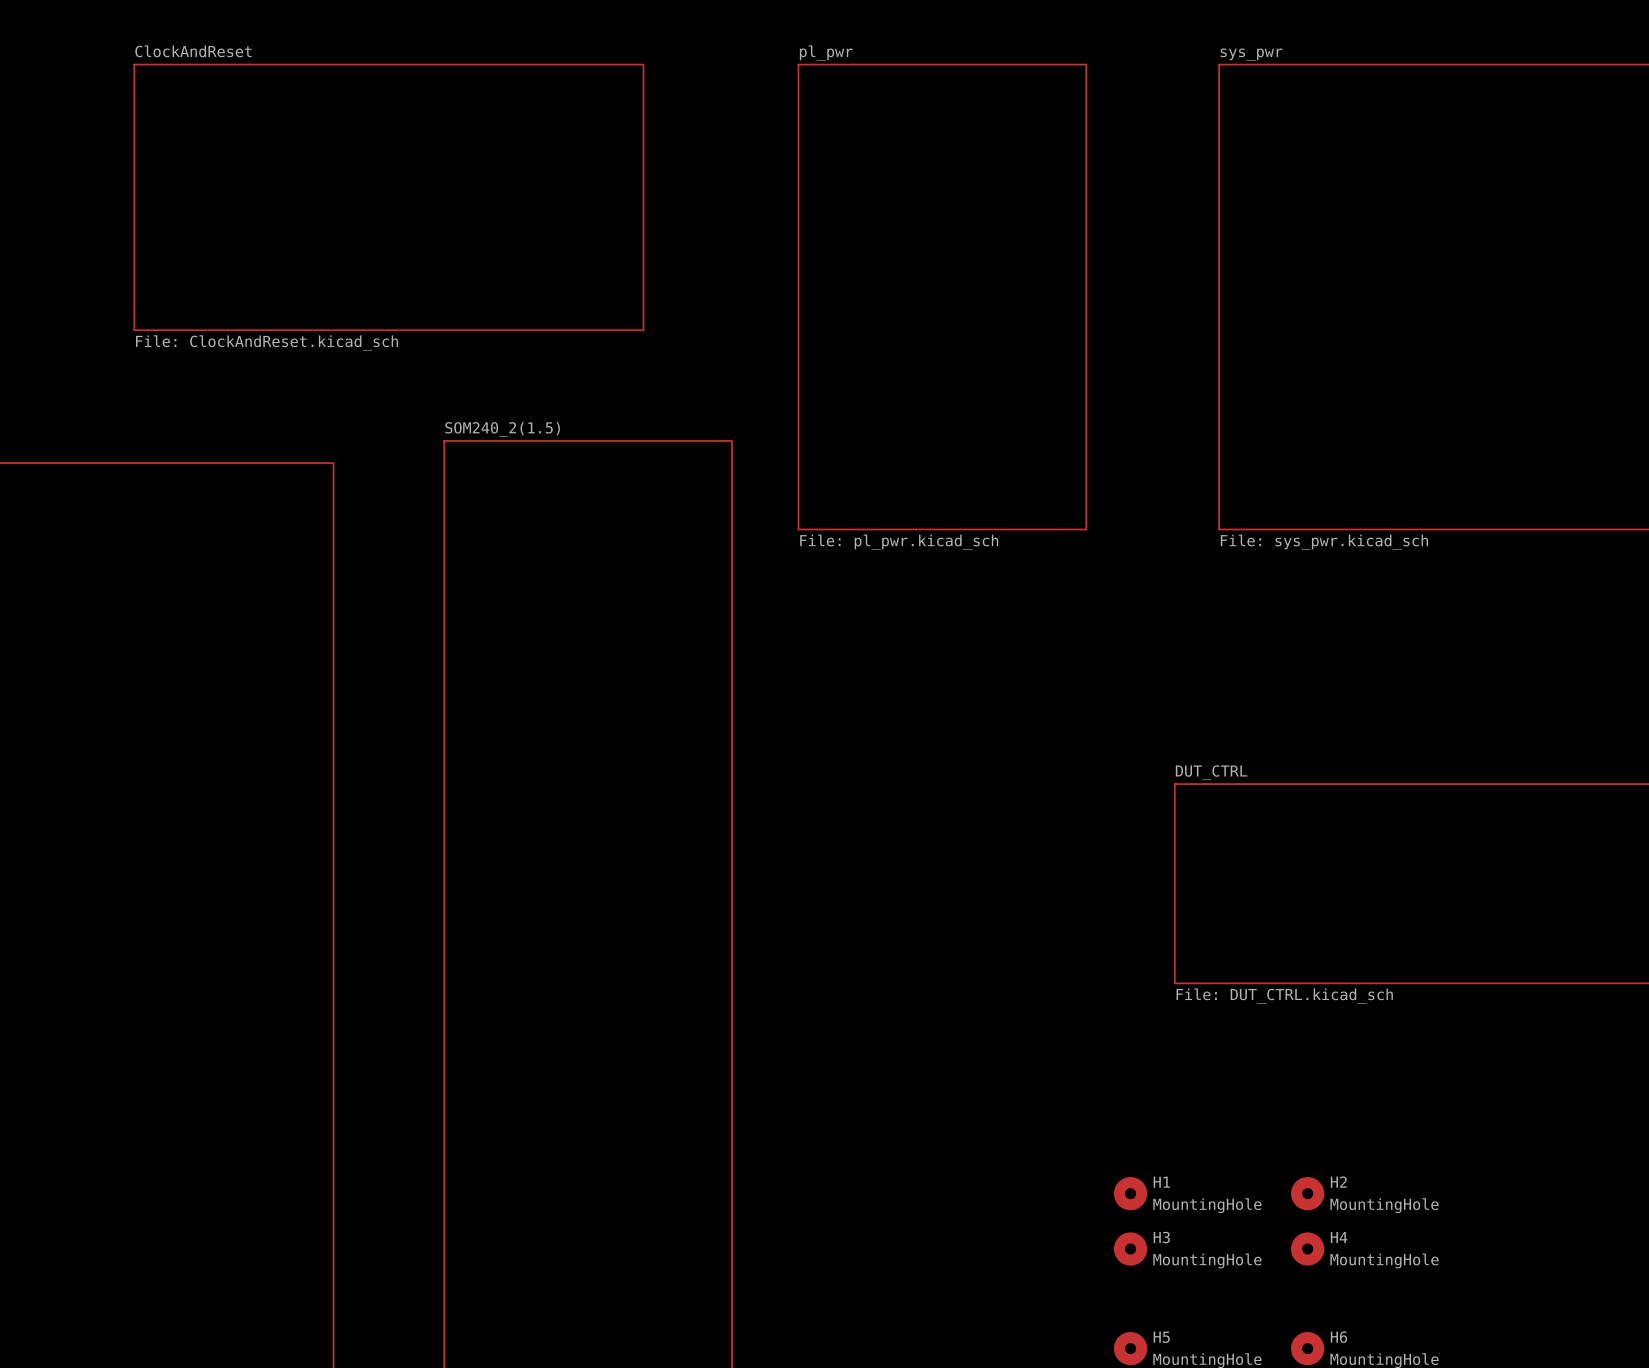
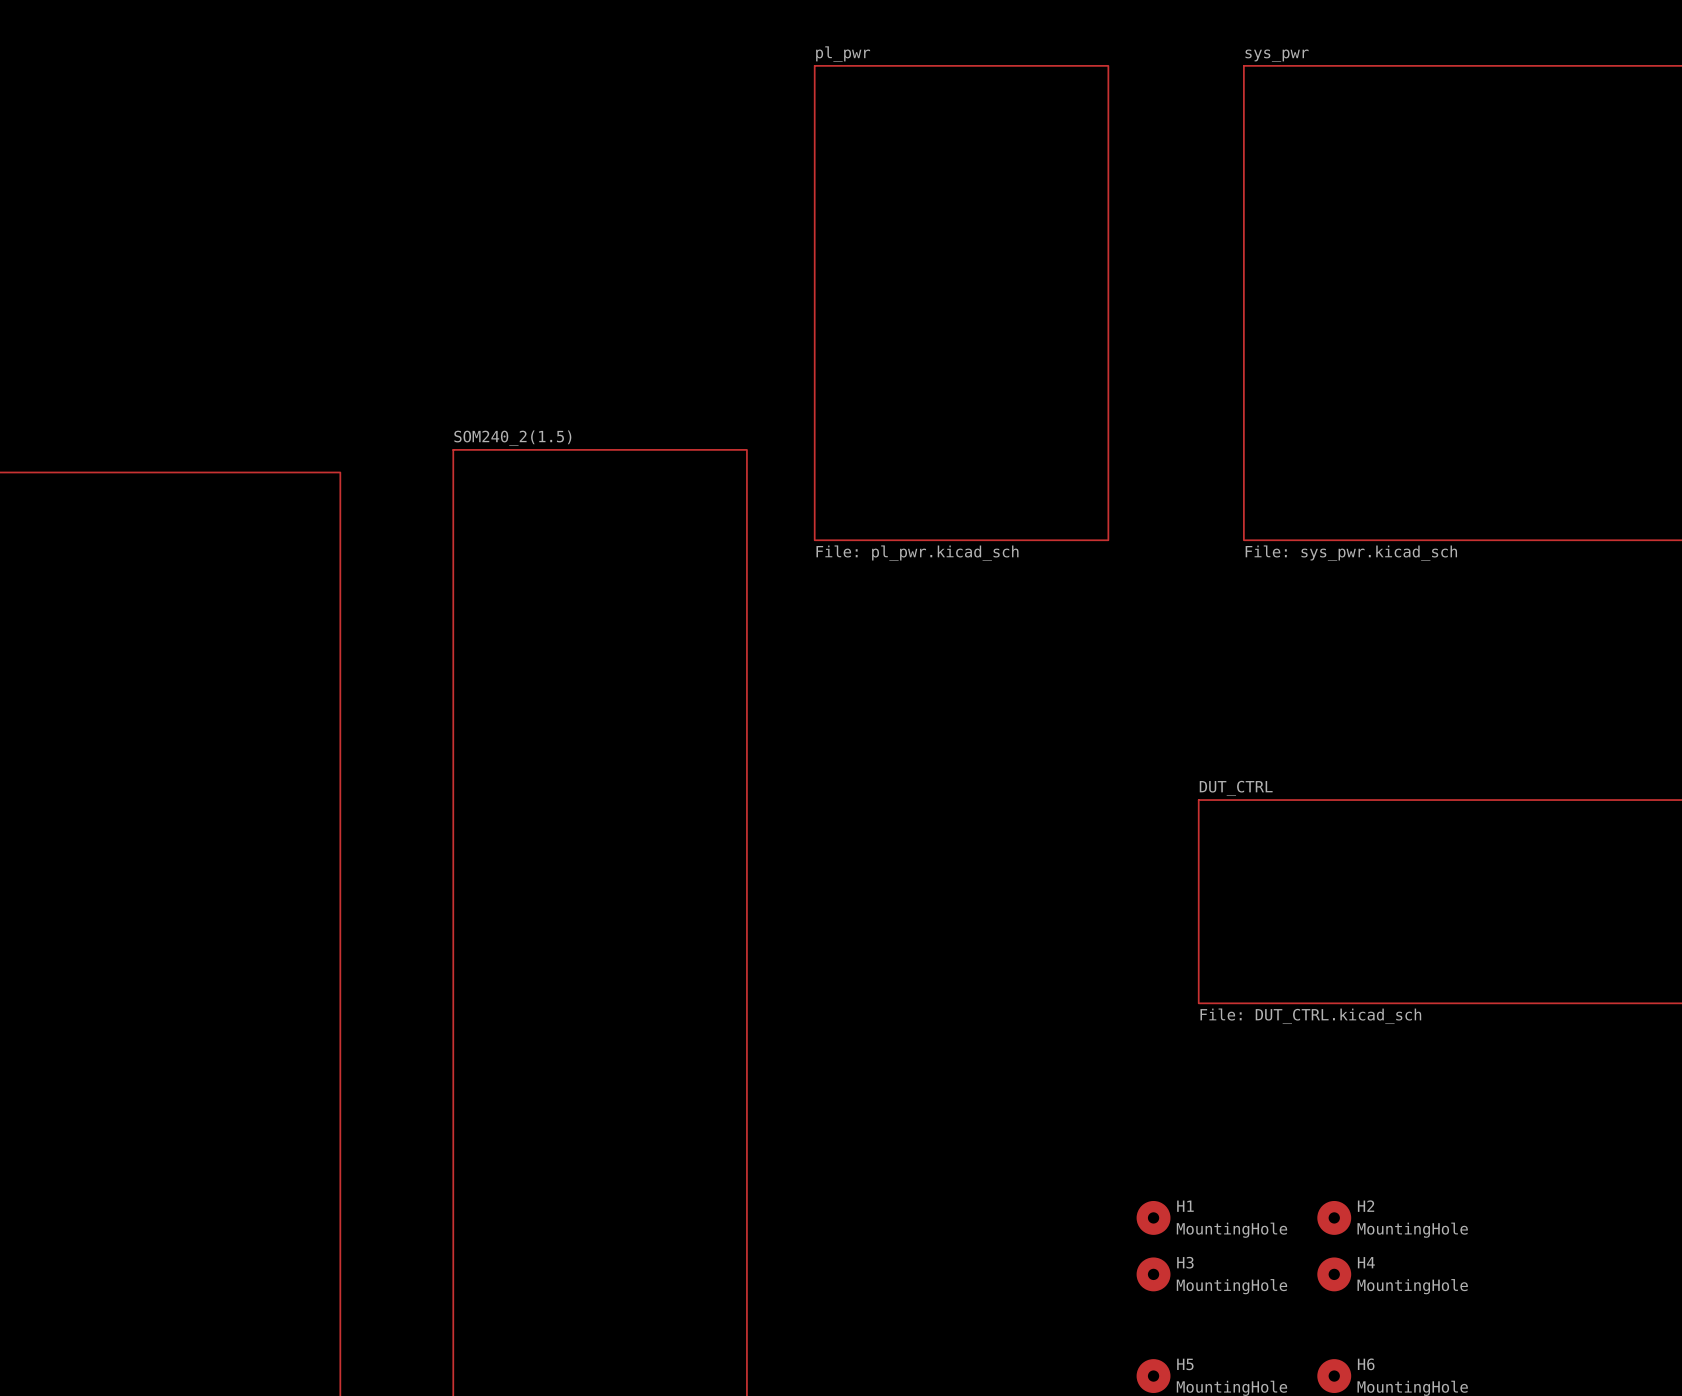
sheet ClockAndReset: File: ClockAndReset.kicad_sch (388, 197) -> none

